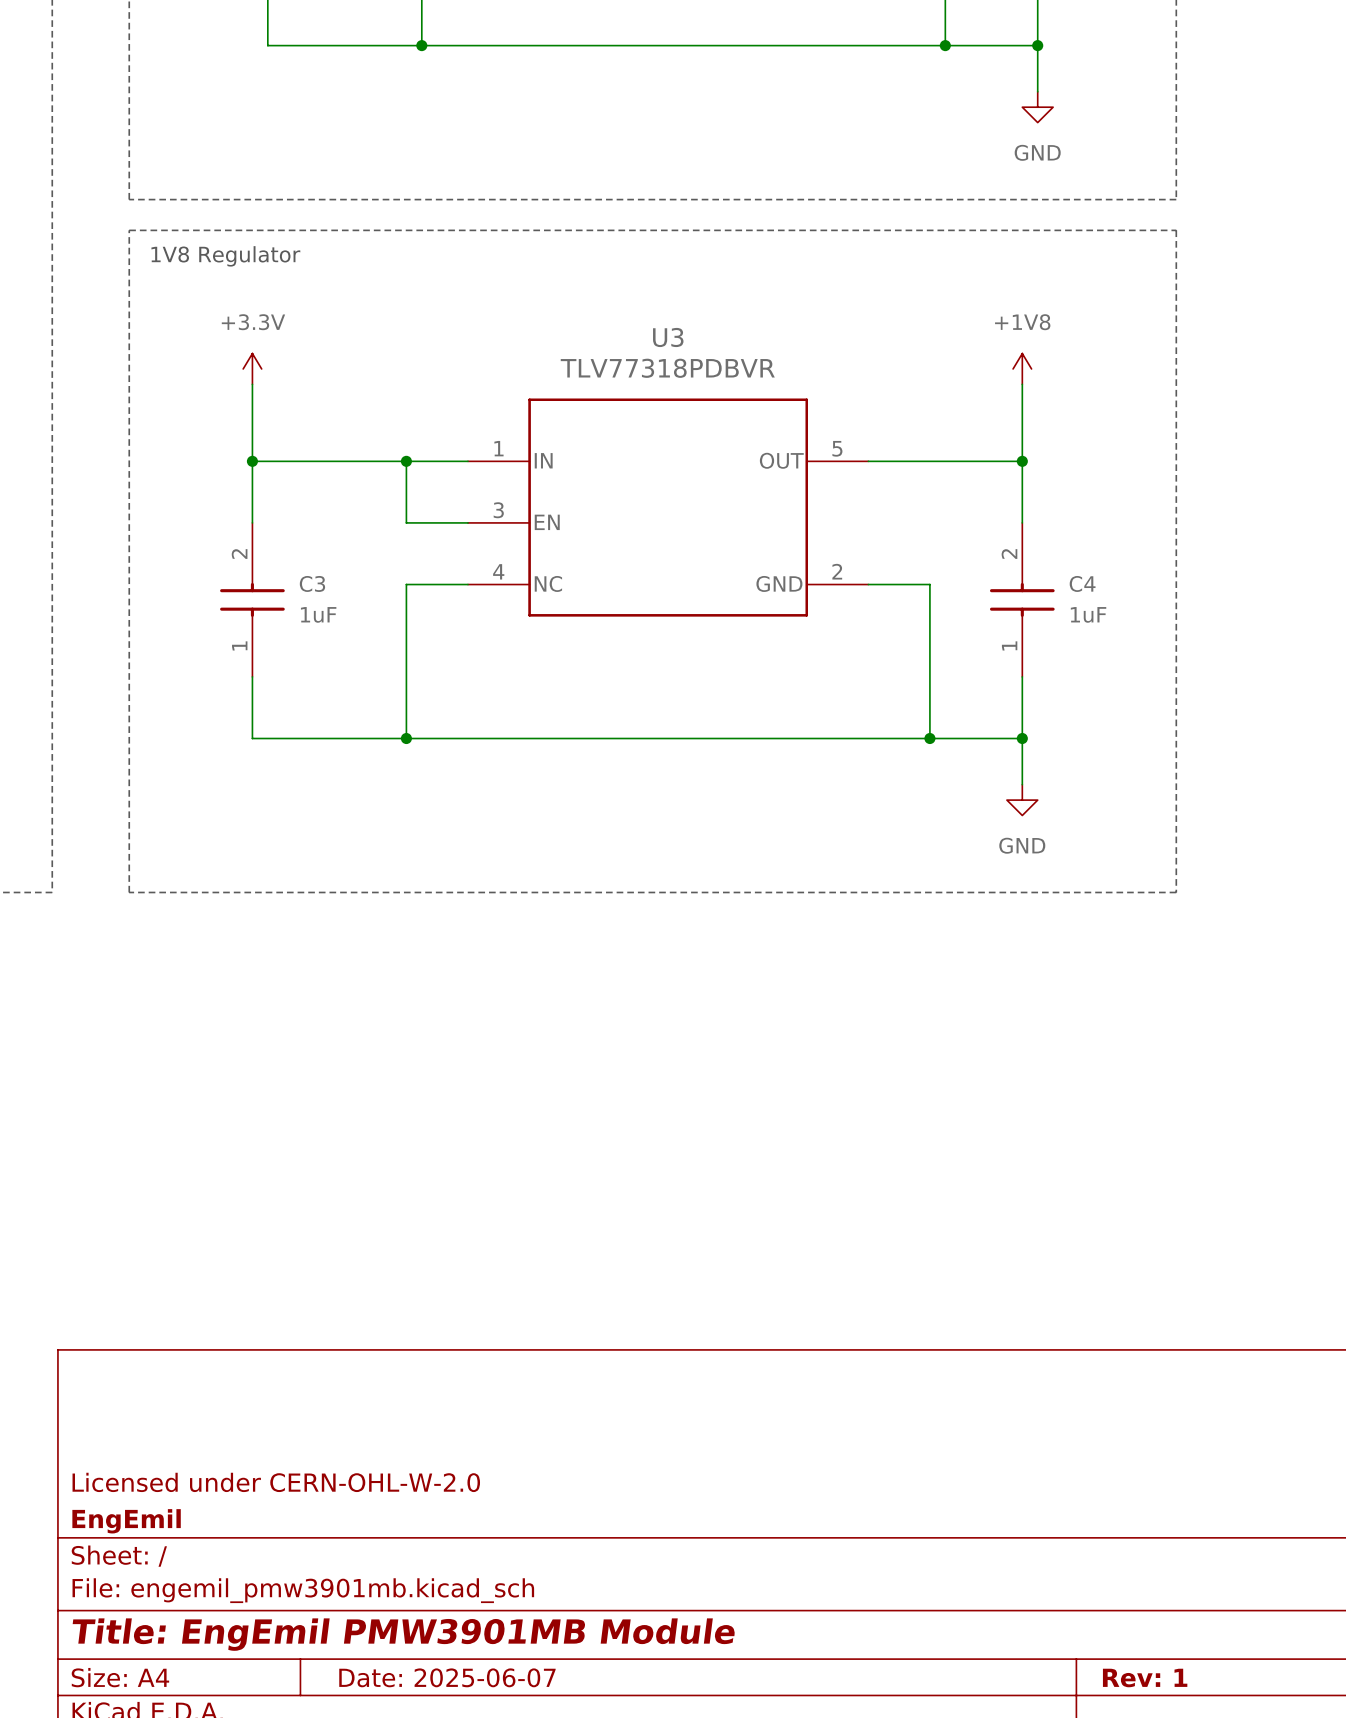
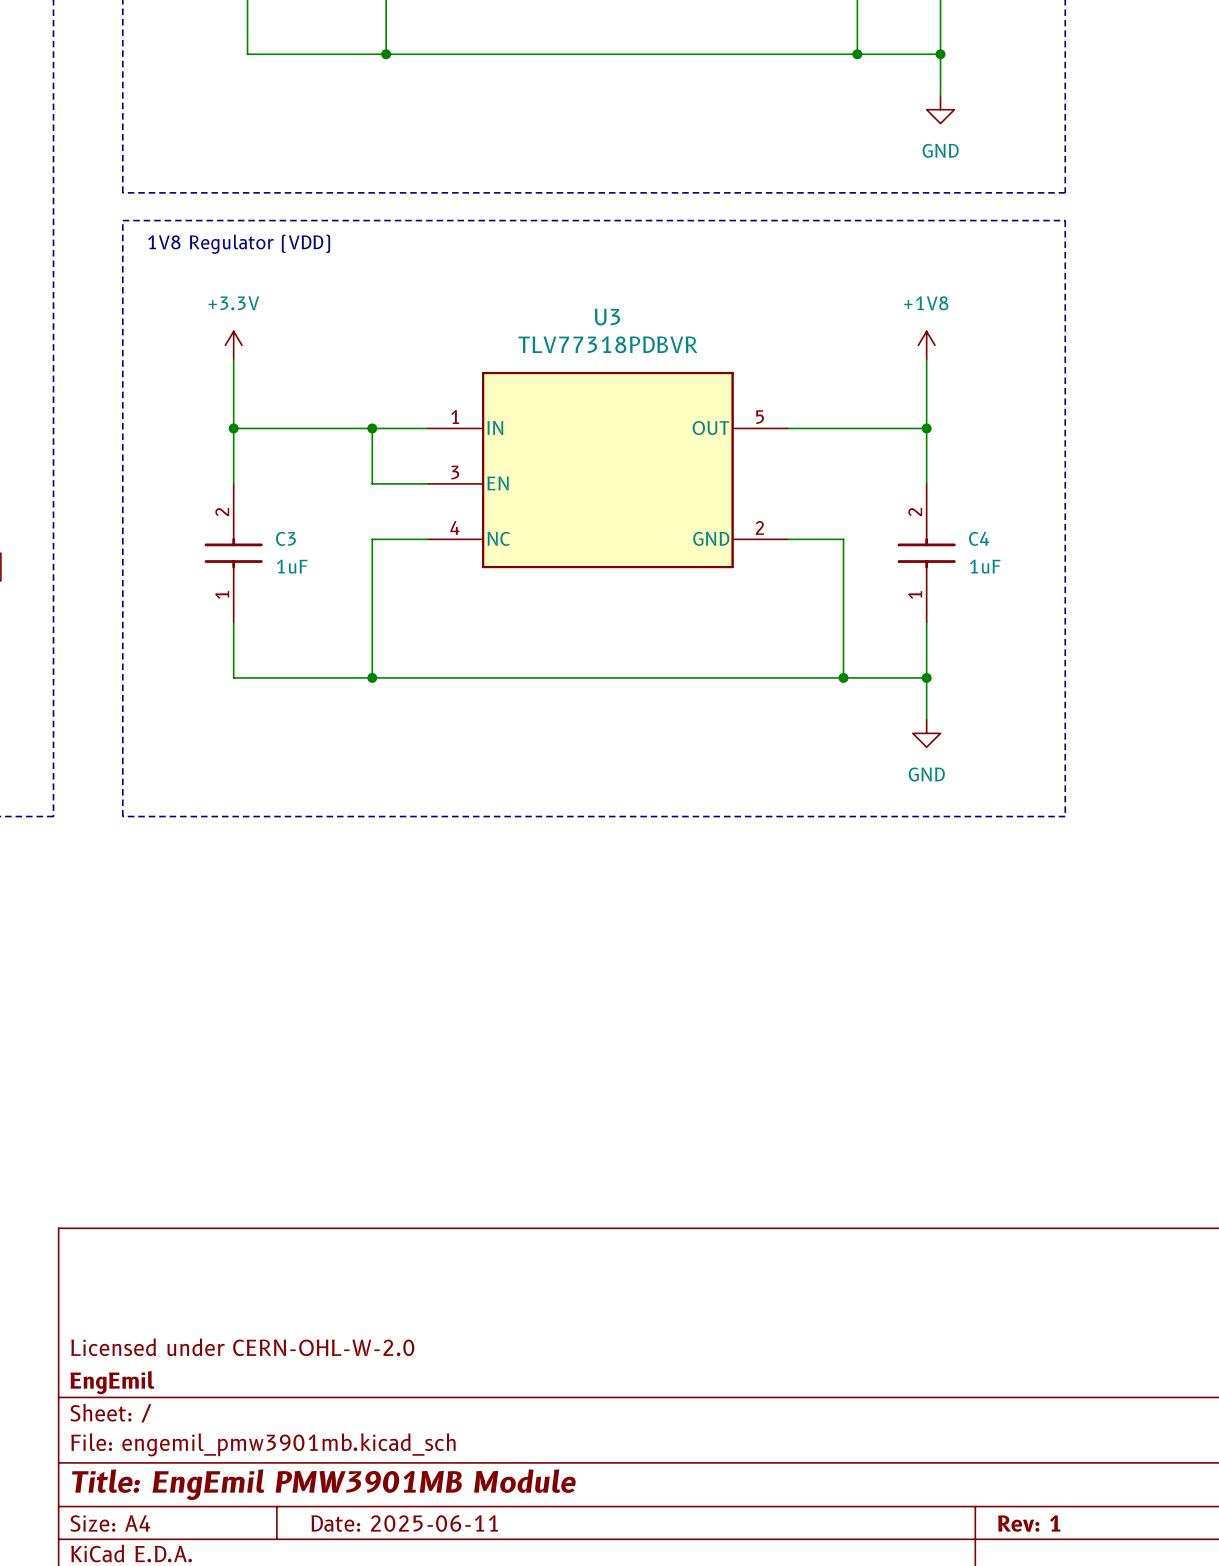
text: 1V8 Regulator (225, 256) -> 1V8 Regulator (VDD) (239, 244)
title block: Date: 2025-06-07 (447, 1677) -> Date: 2025-06-11 (404, 1523)

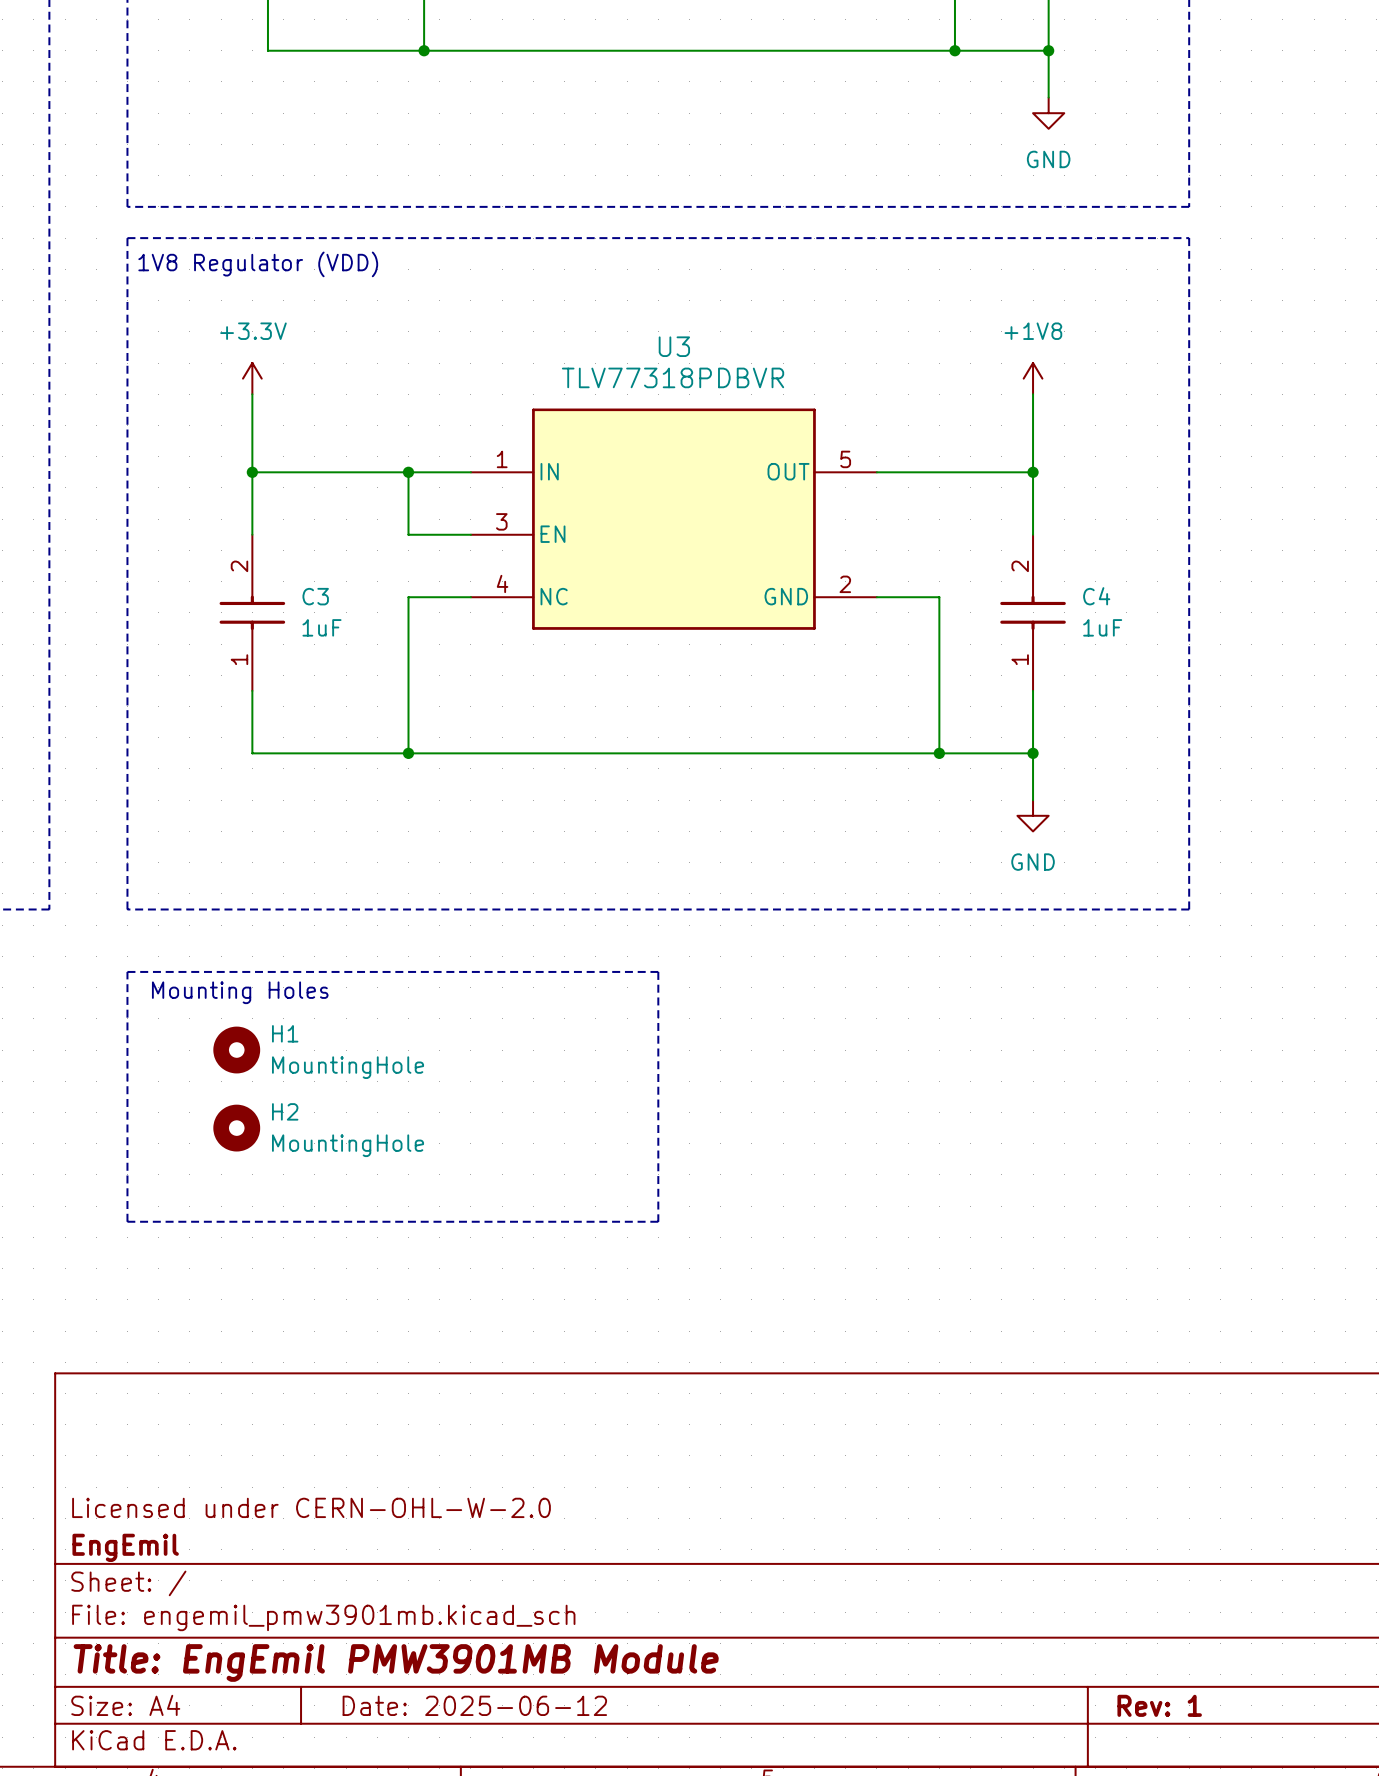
line: none -> (127, 971) (658, 971) (658, 1221) (127, 1221) (127, 971)
text: none -> Mounting Holes (240, 992)
H1: none -> MountingHole (236, 1050)
H2: none -> MountingHole (236, 1128)
title block: Date: 2025-06-11 (404, 1523) -> Date: 2025-06-12 (474, 1705)

